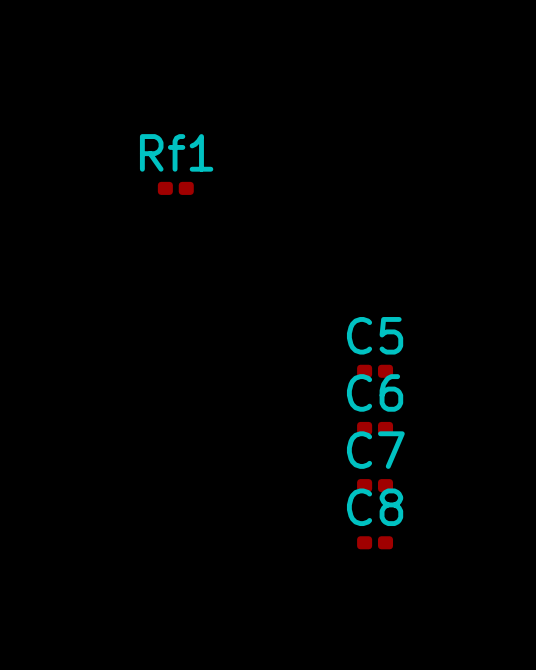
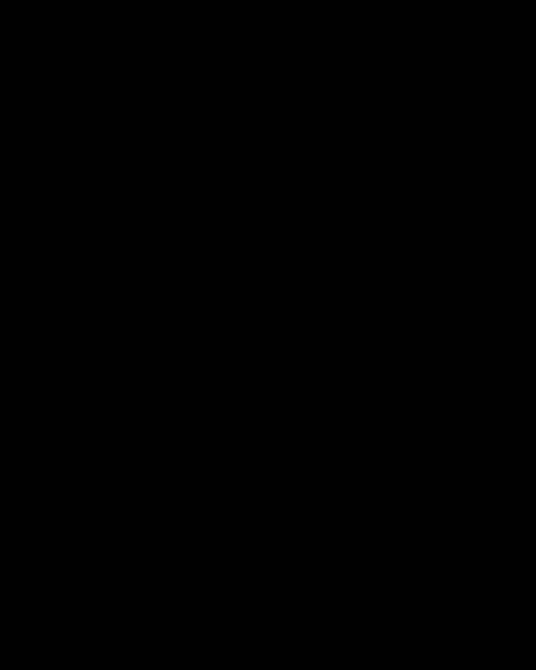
Rf1: (175, 188) -> none
C5: (375, 371) -> none
C6: (375, 428) -> none
C7: (375, 485) -> none
C8: (375, 542) -> none

